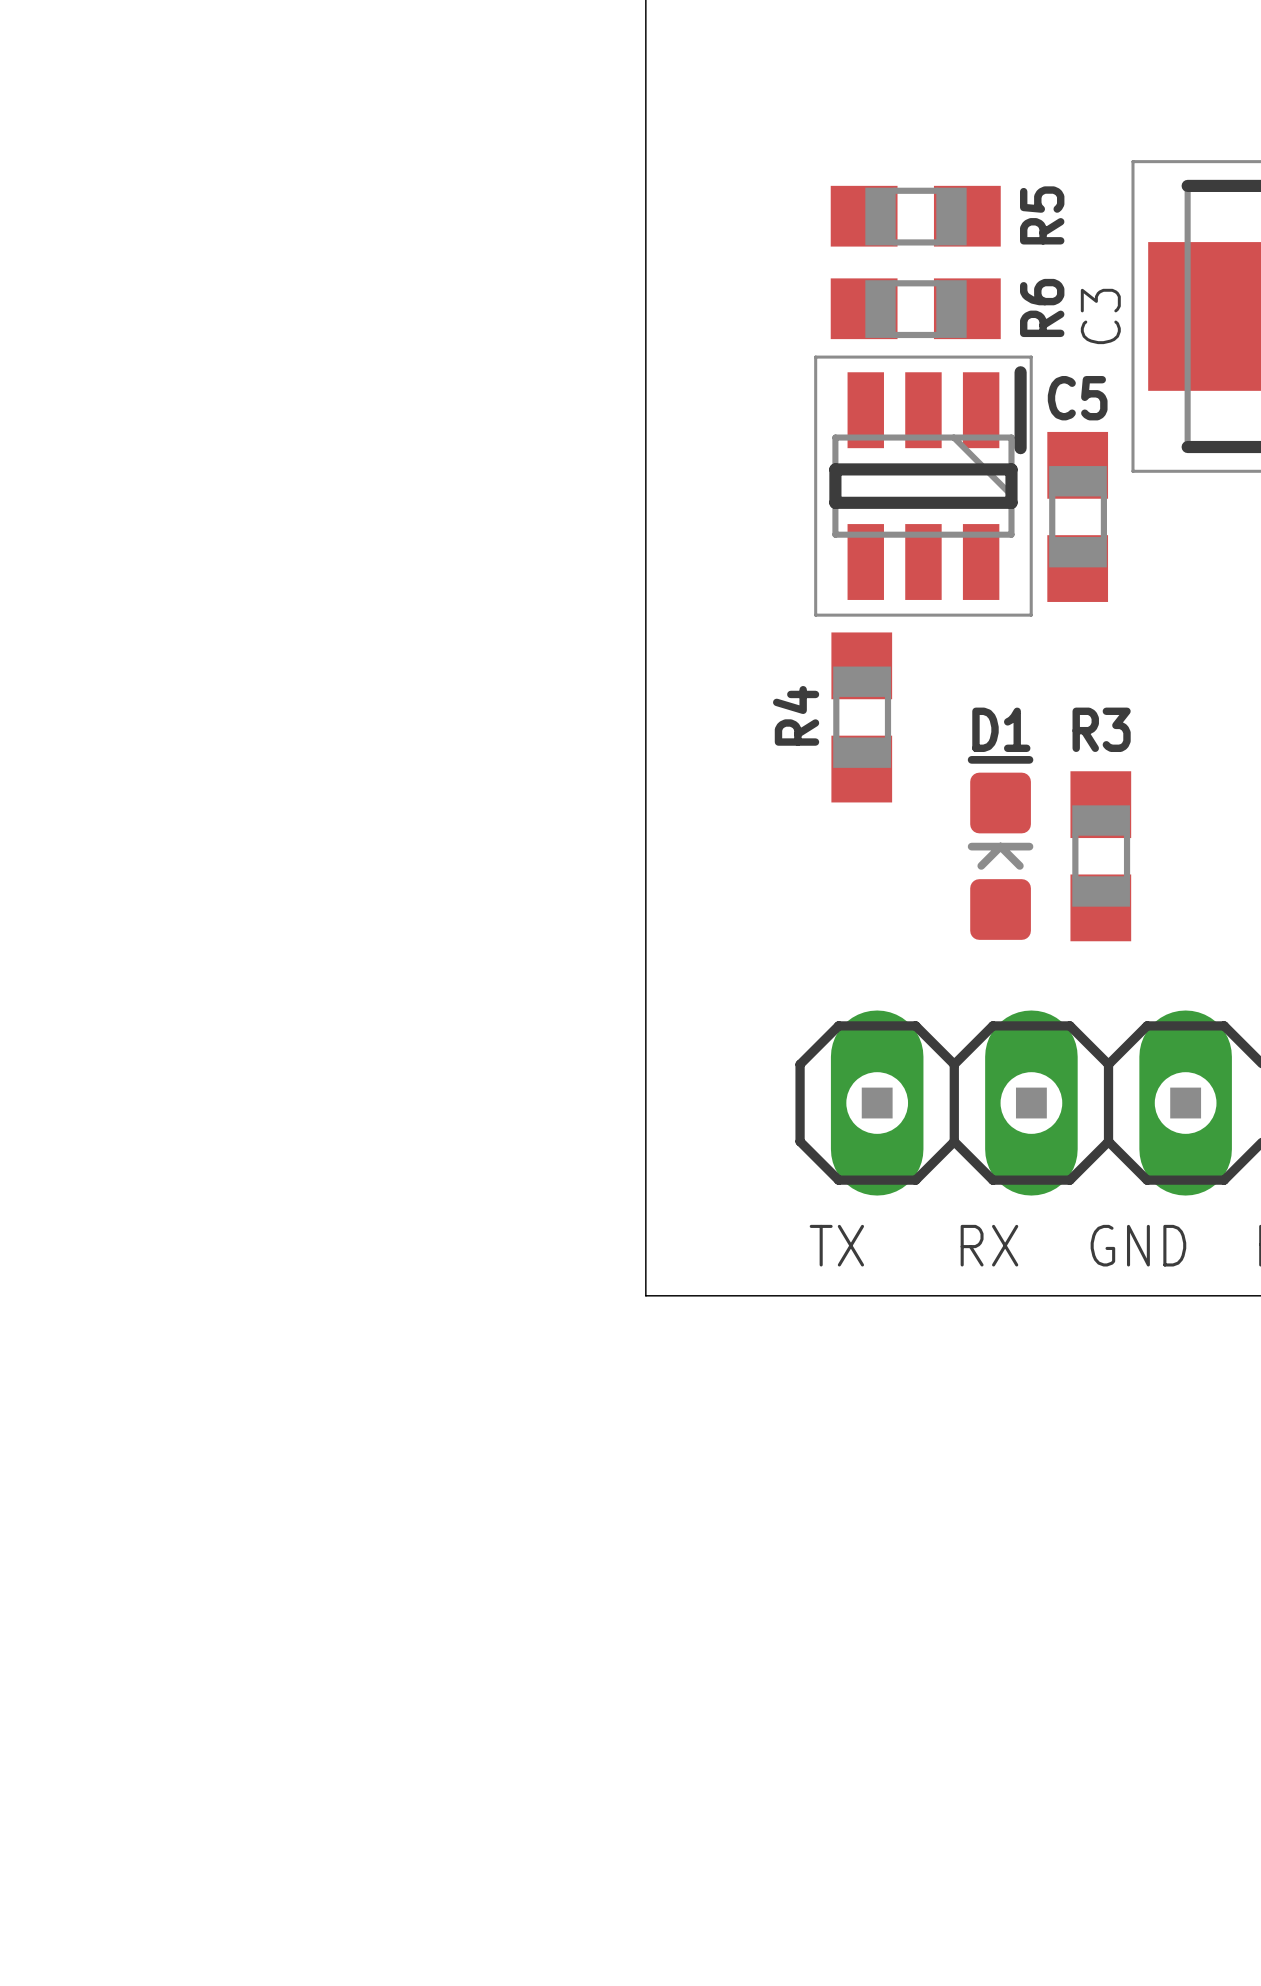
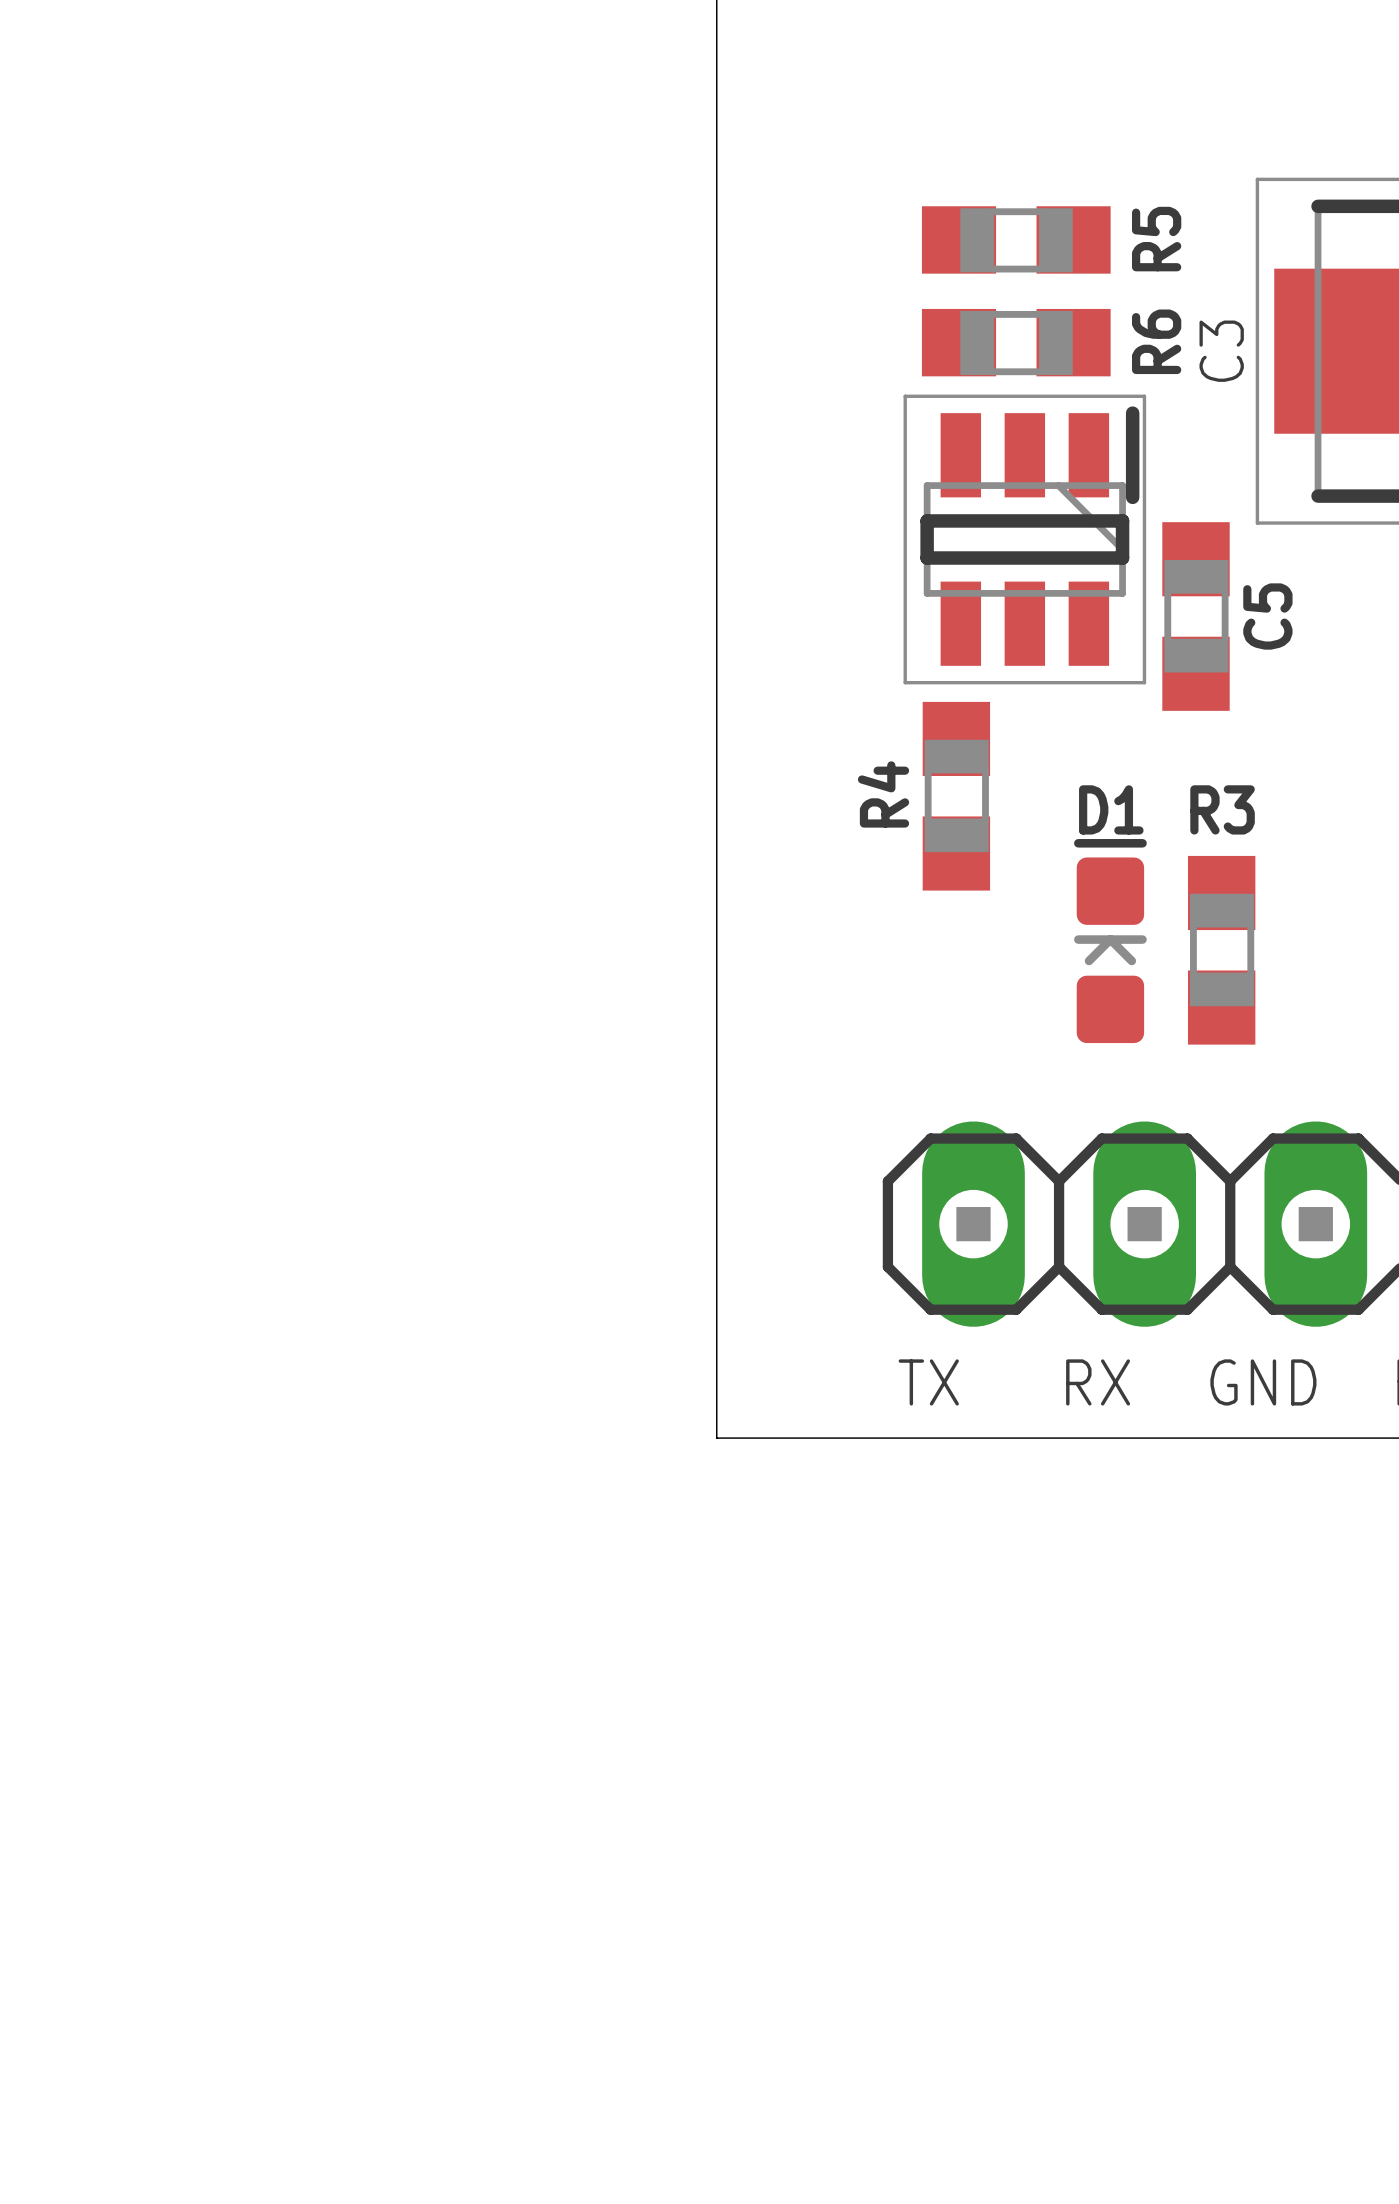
C5 name rotation: 0° (1077, 398) -> 90° counterclockwise (1267, 616)
C5 name position: C5 (1077, 398) -> C5 (1267, 616)
C5 position: (1077, 516) -> (1196, 616)

